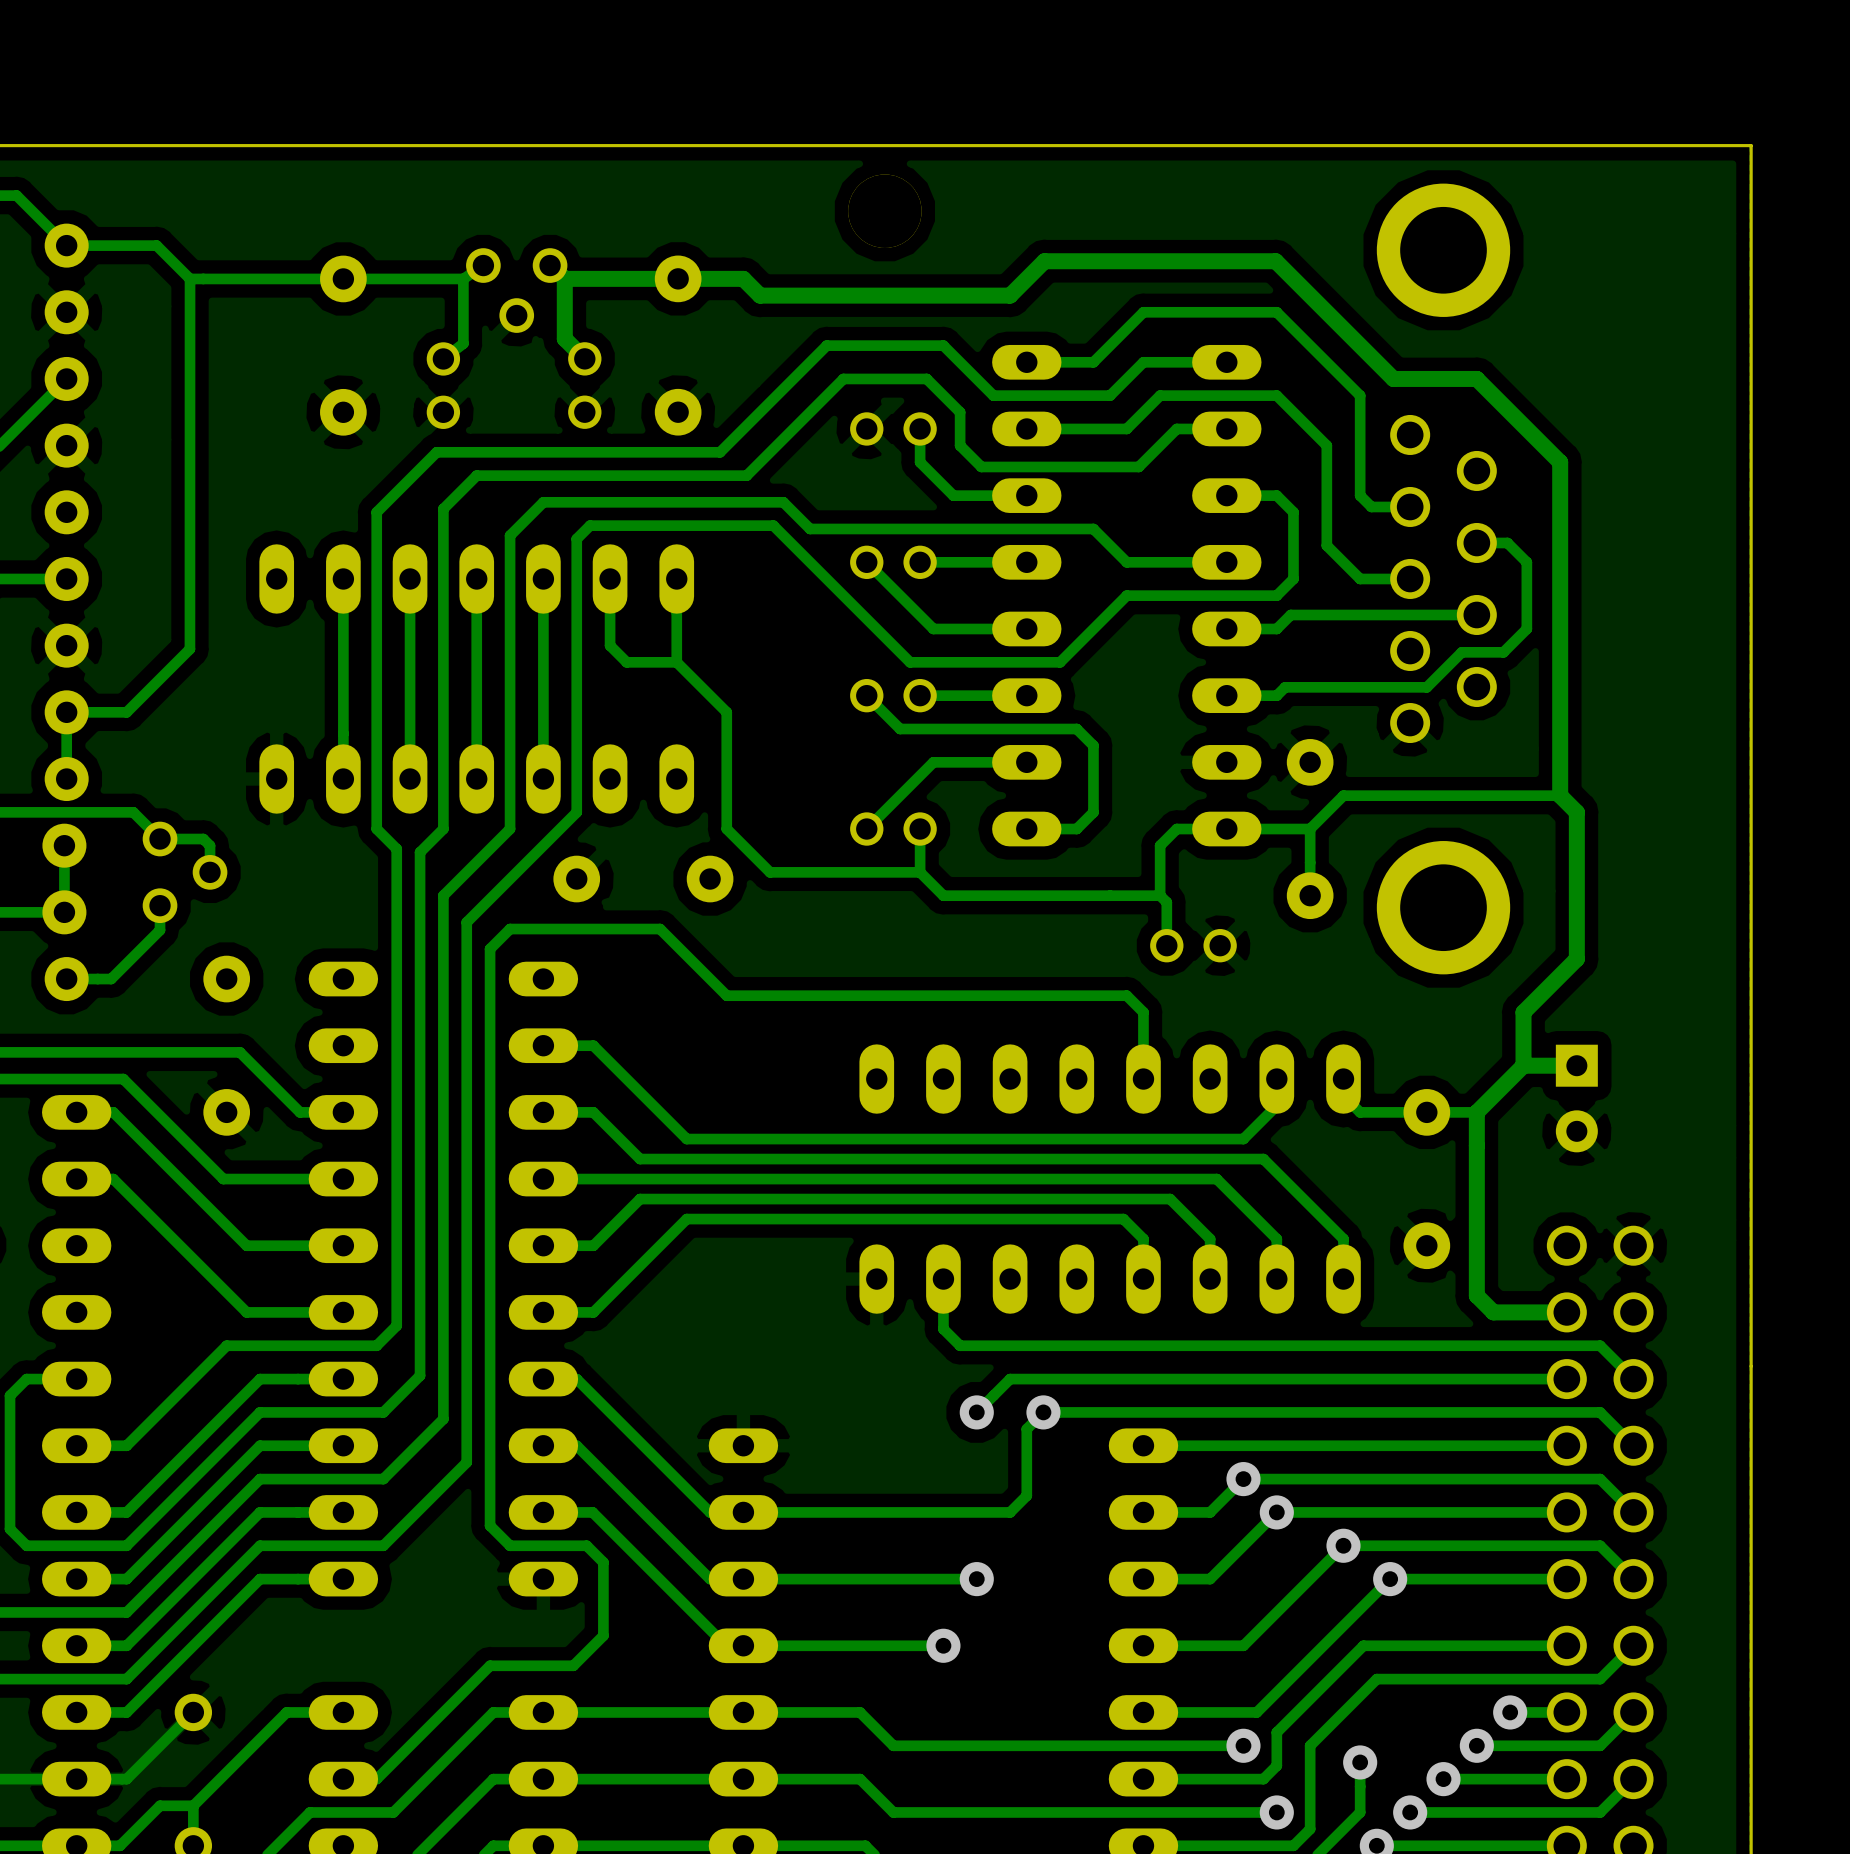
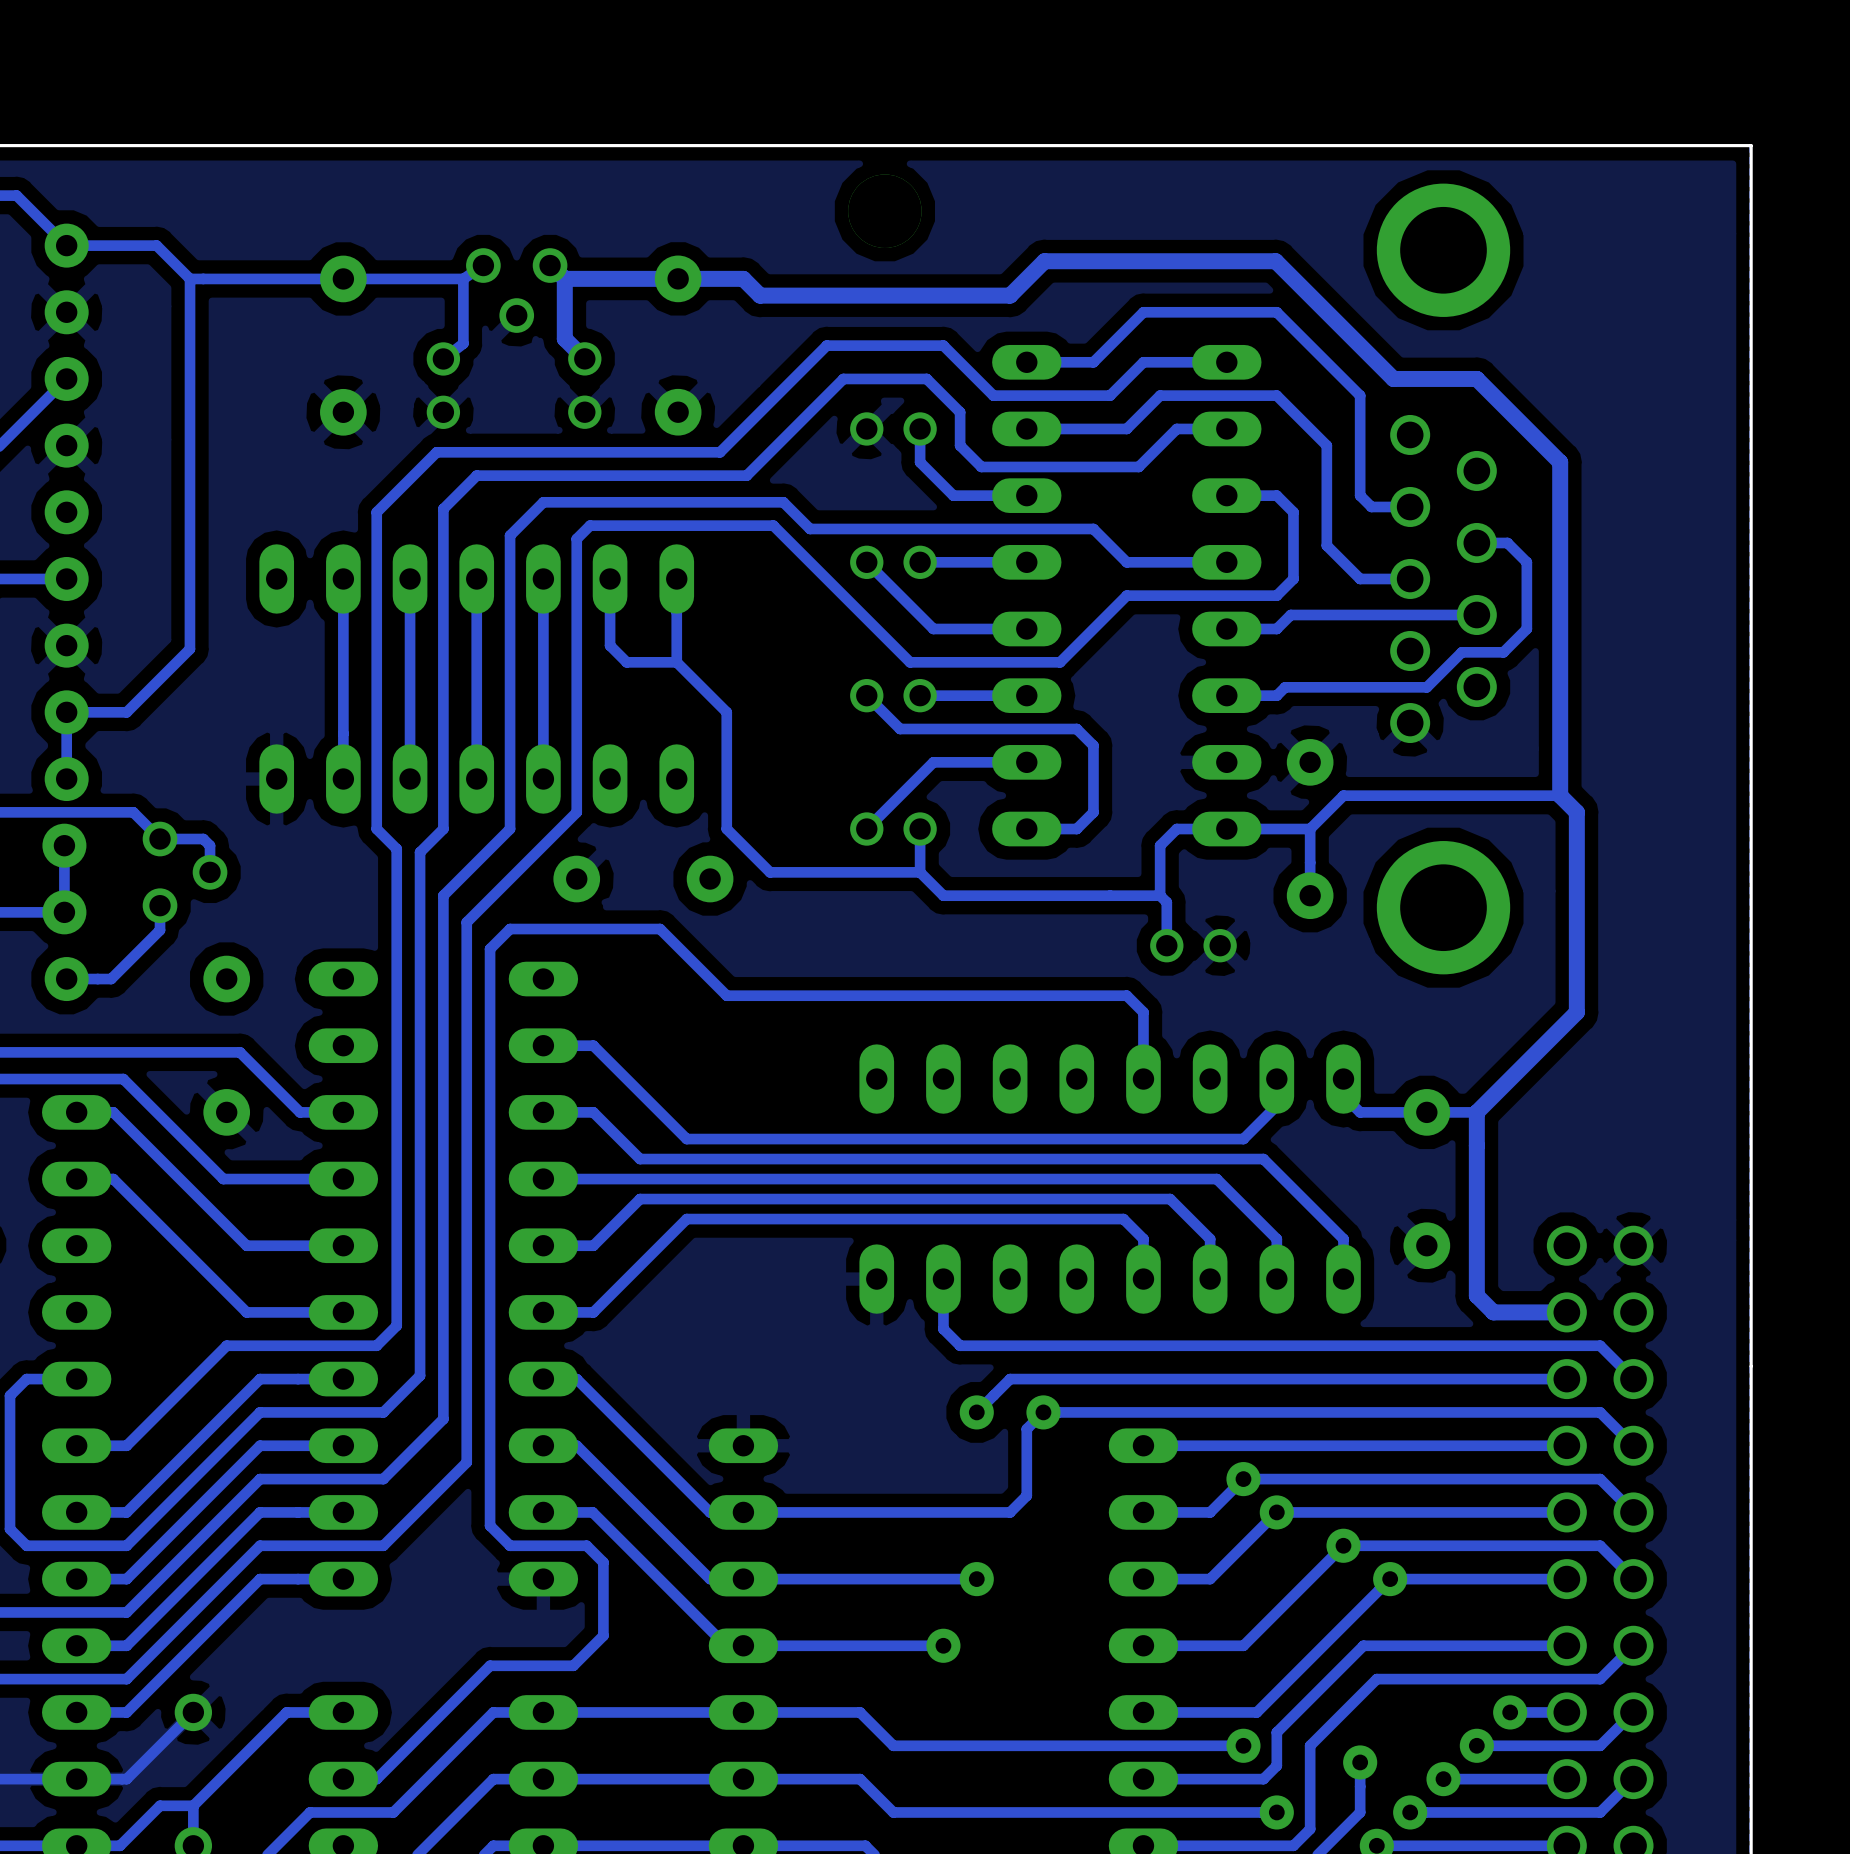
track: (1576, 959) (1523, 1012) (1523, 1065) (1576, 1065) -> (1576, 959) (1576, 1012) (1523, 1065)
part: (1576, 1098) -> none

